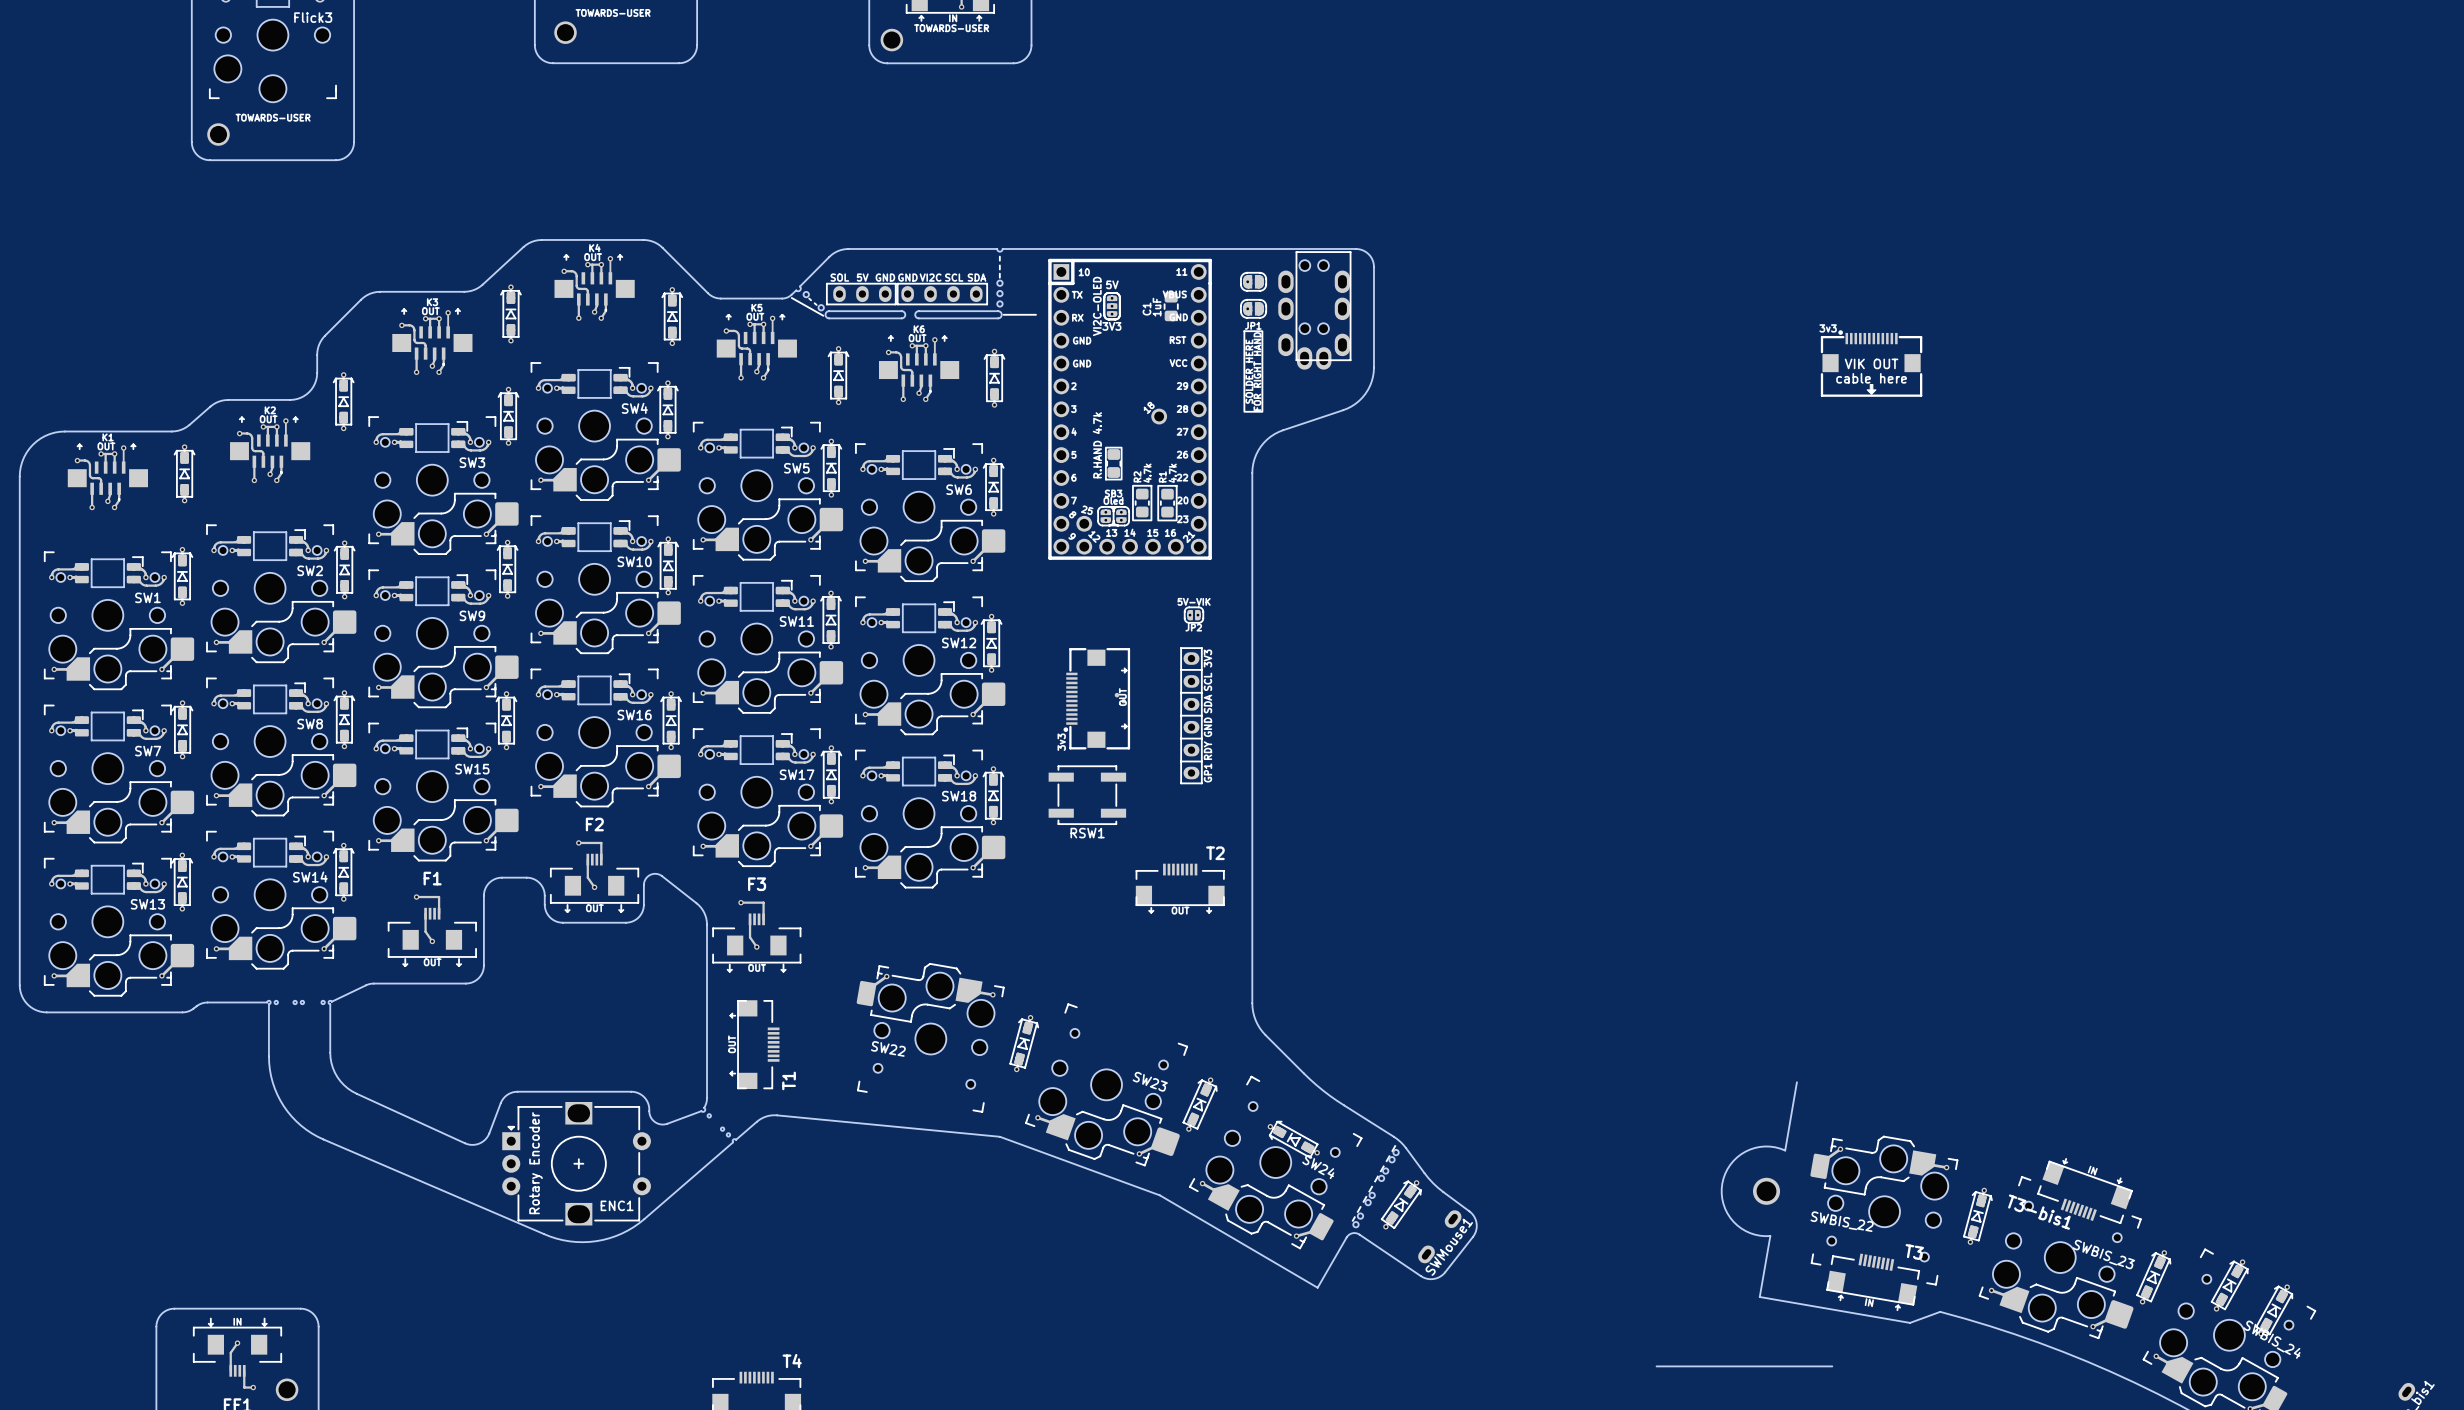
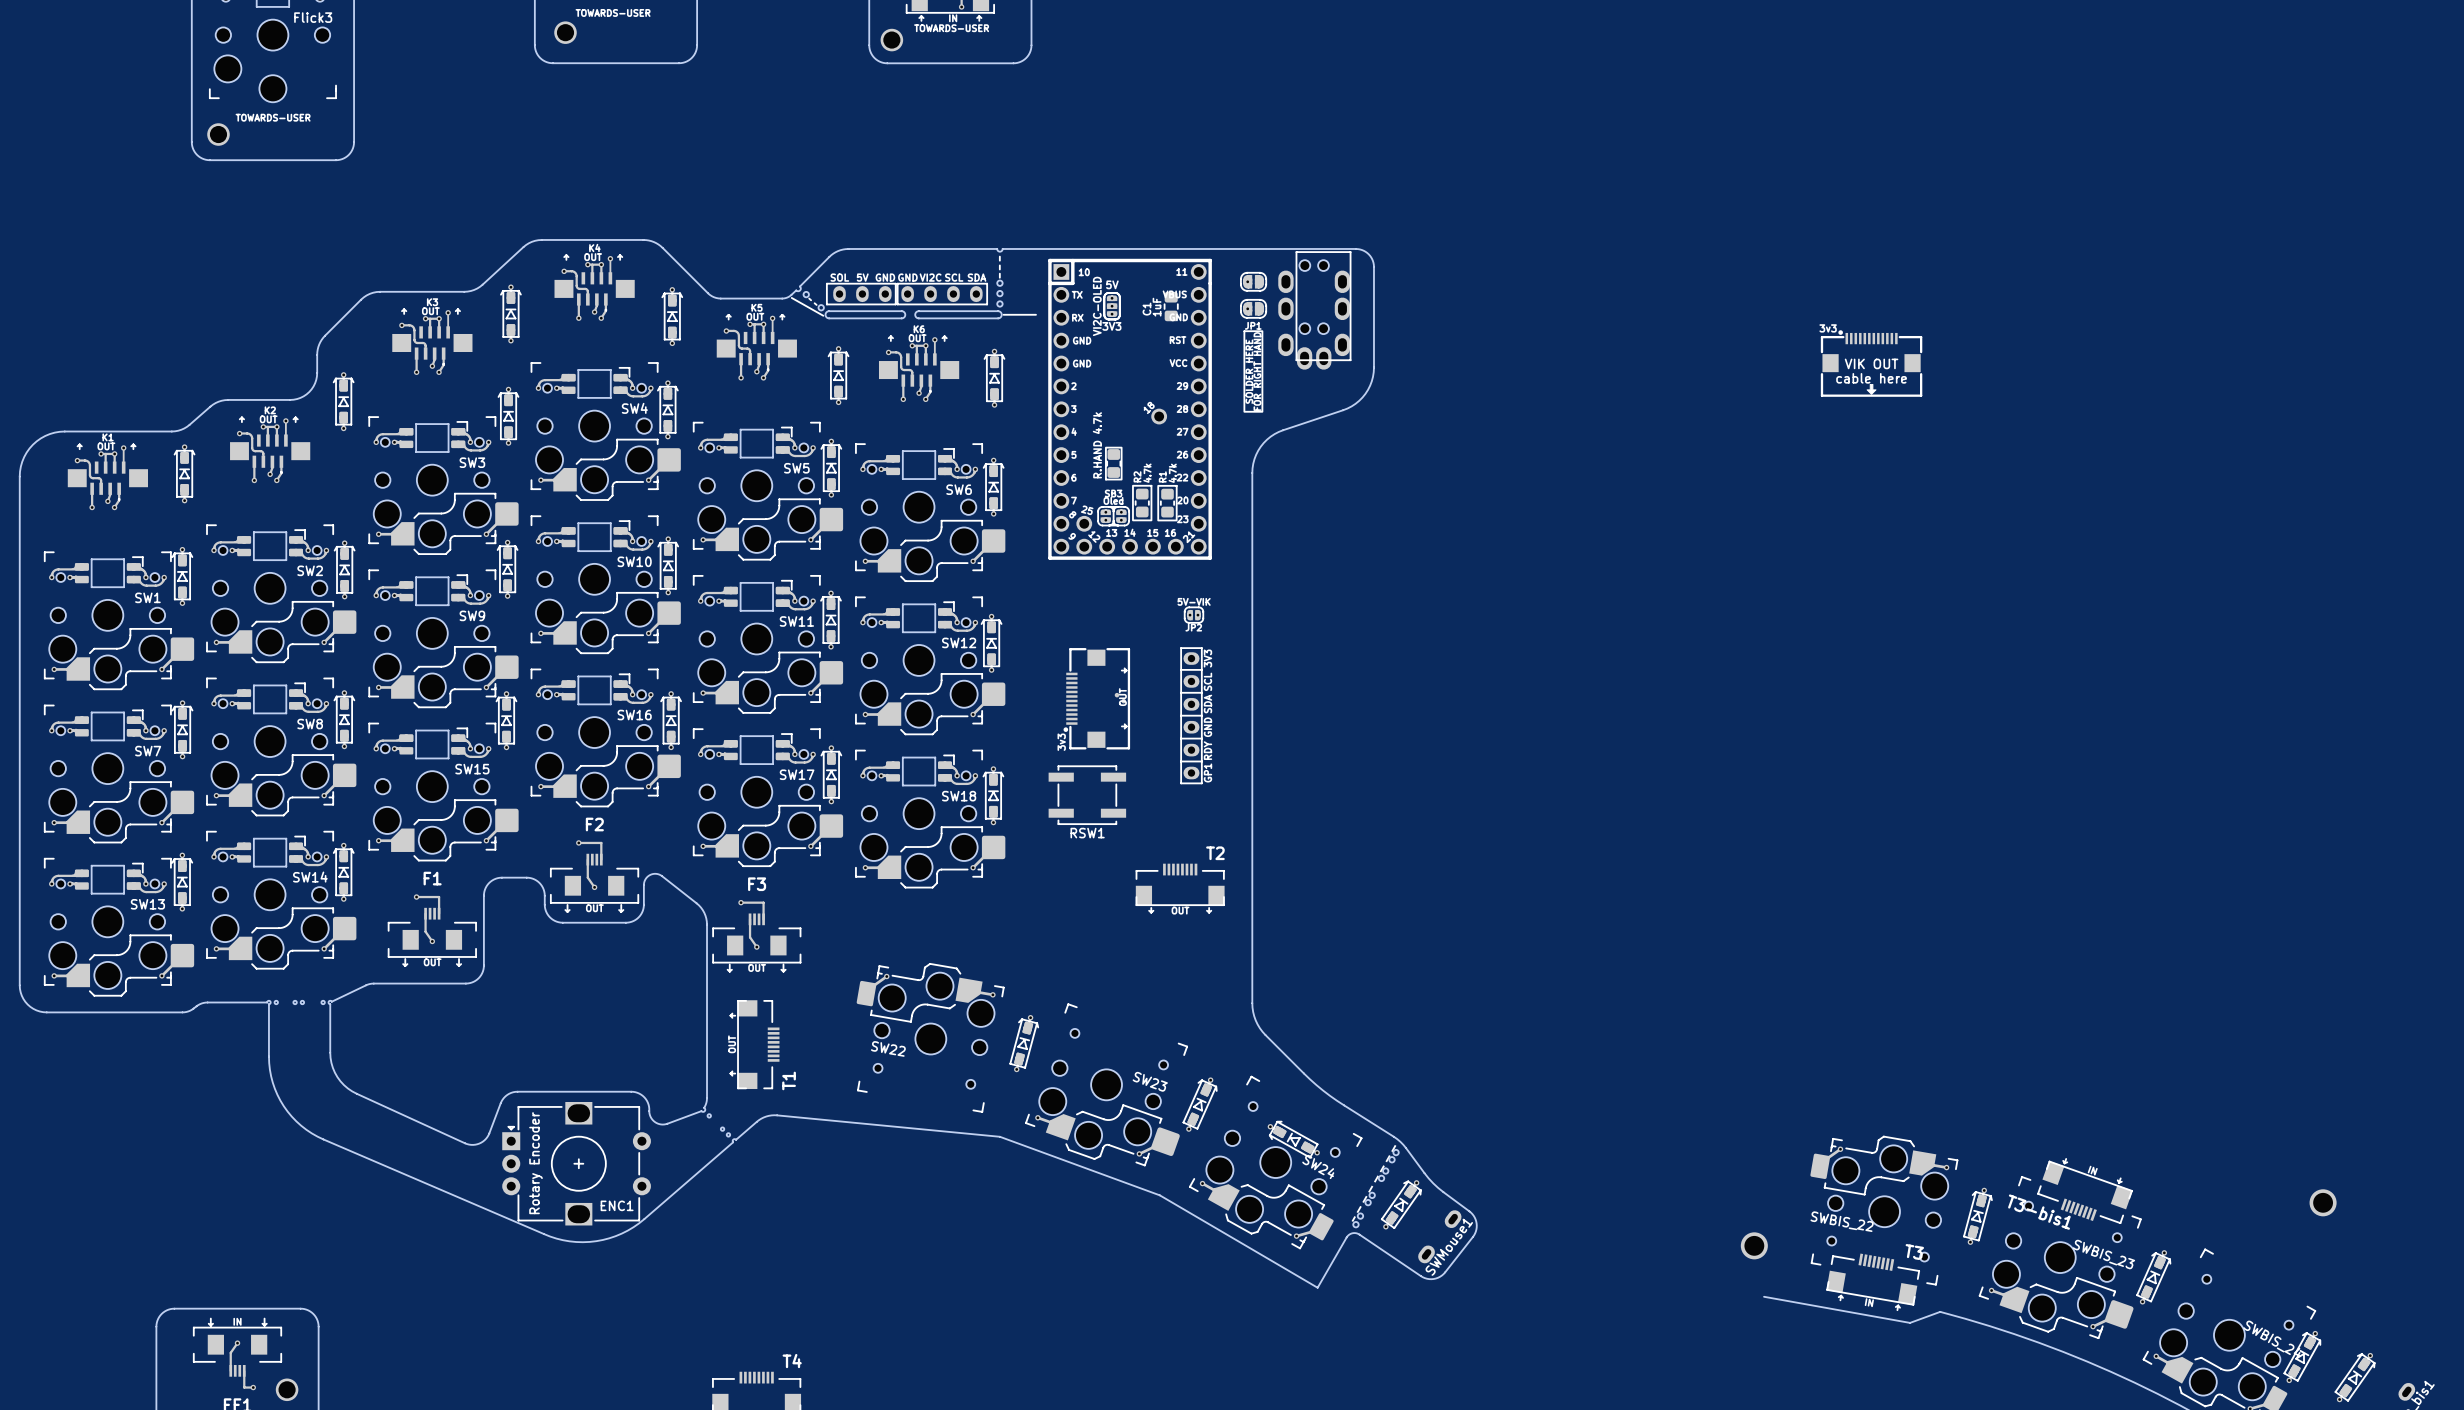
board edge: (1796, 1082) (1785, 1150) (1765, 1146) (1745, 1151) (1730, 1164) (1722, 1183) (1723, 1203) (1733, 1221) (1750, 1233) (1770, 1236) (1759, 1297) (1910, 1322) -> (1764, 1296) (1910, 1322)
part position: (1766, 1191) -> (1754, 1245)
part: none -> (2323, 1202)
part: (2229, 1285) -> none
part: (2274, 1310) -> none
part: none -> (2302, 1357)
board edge: (1656, 1366) (1832, 1366) -> none
part: none -> (2354, 1377)

